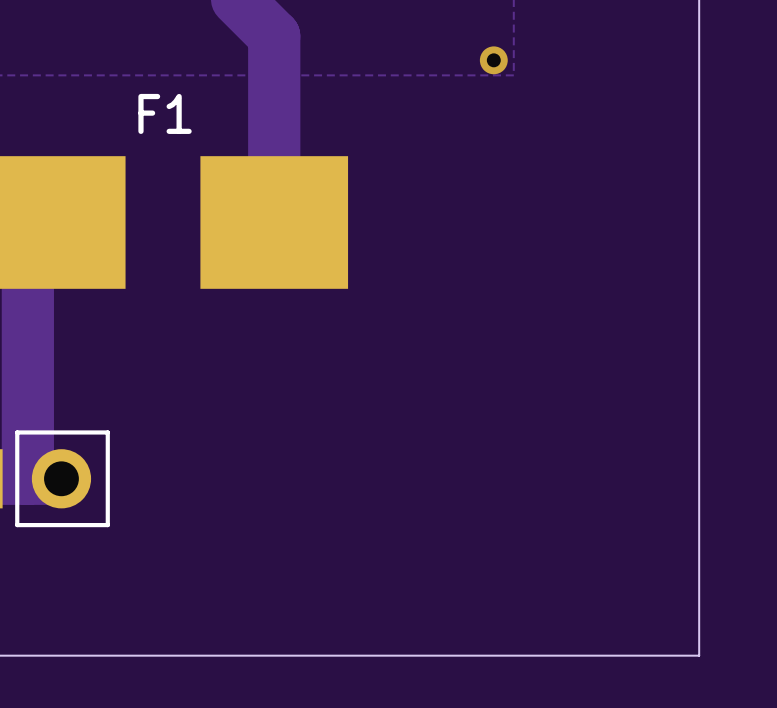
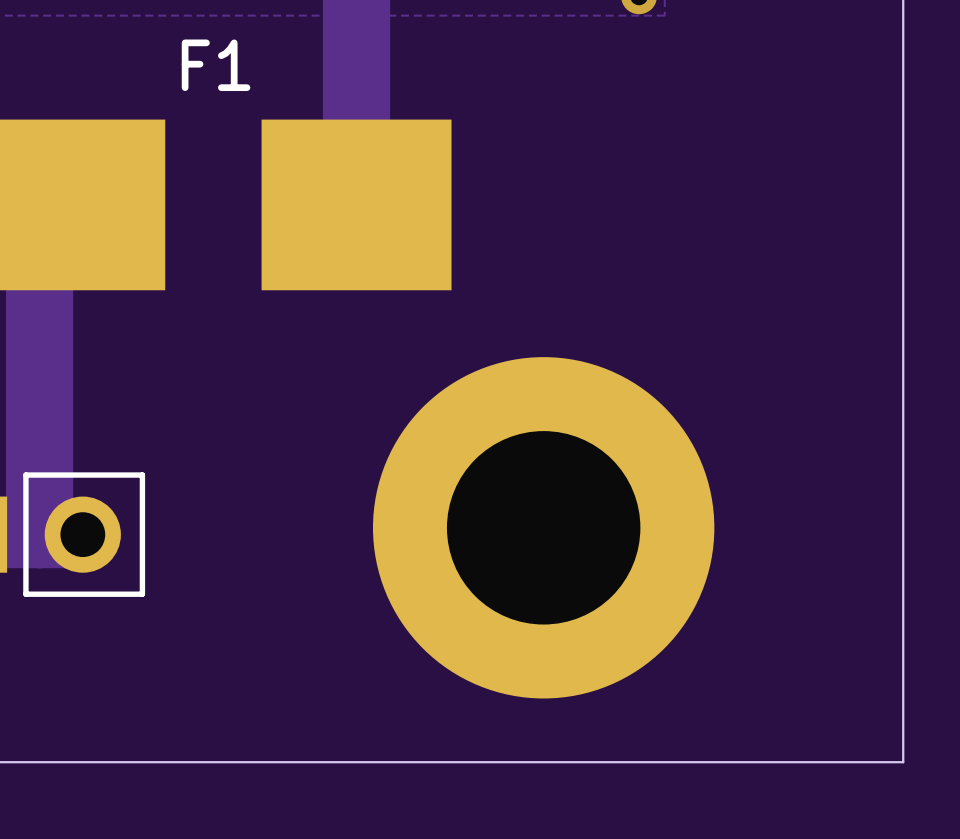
part: none -> (543, 527)

